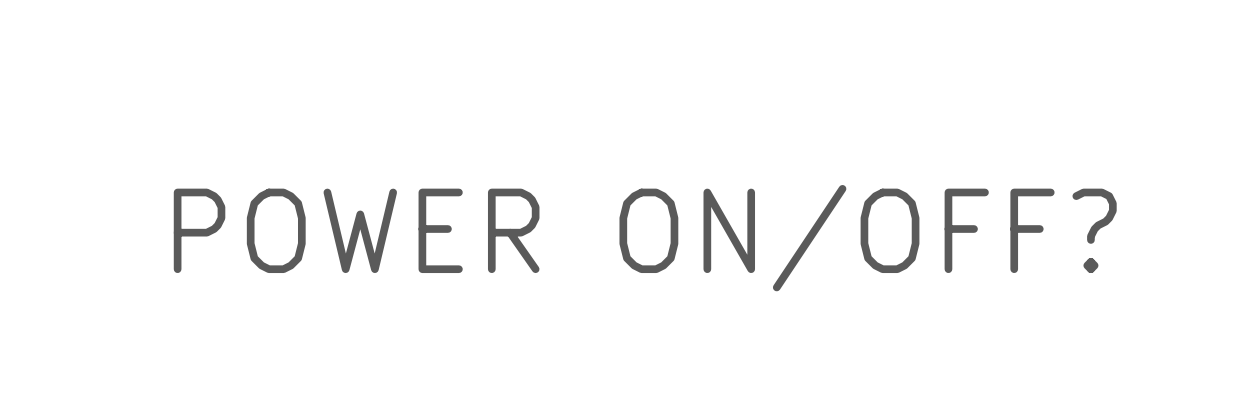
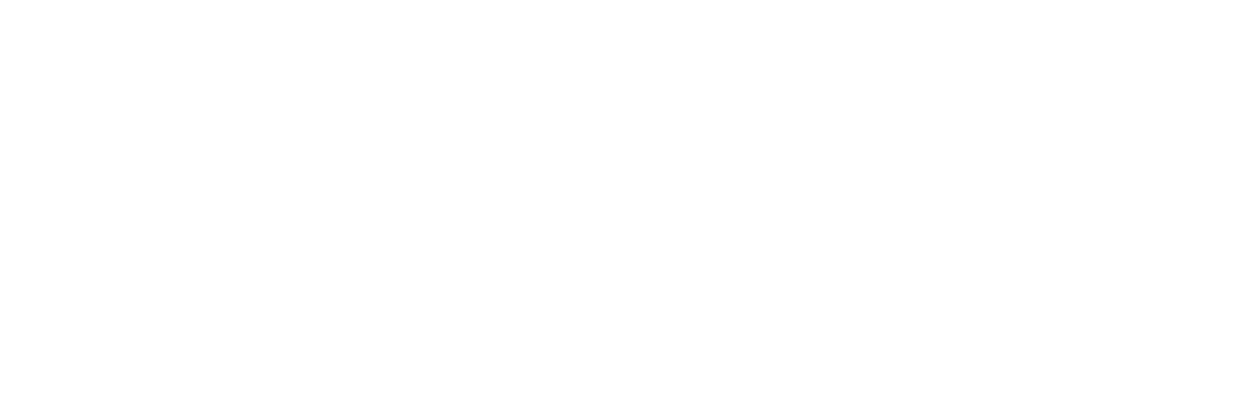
text: POWER ON/OFF? (645, 238) -> none

